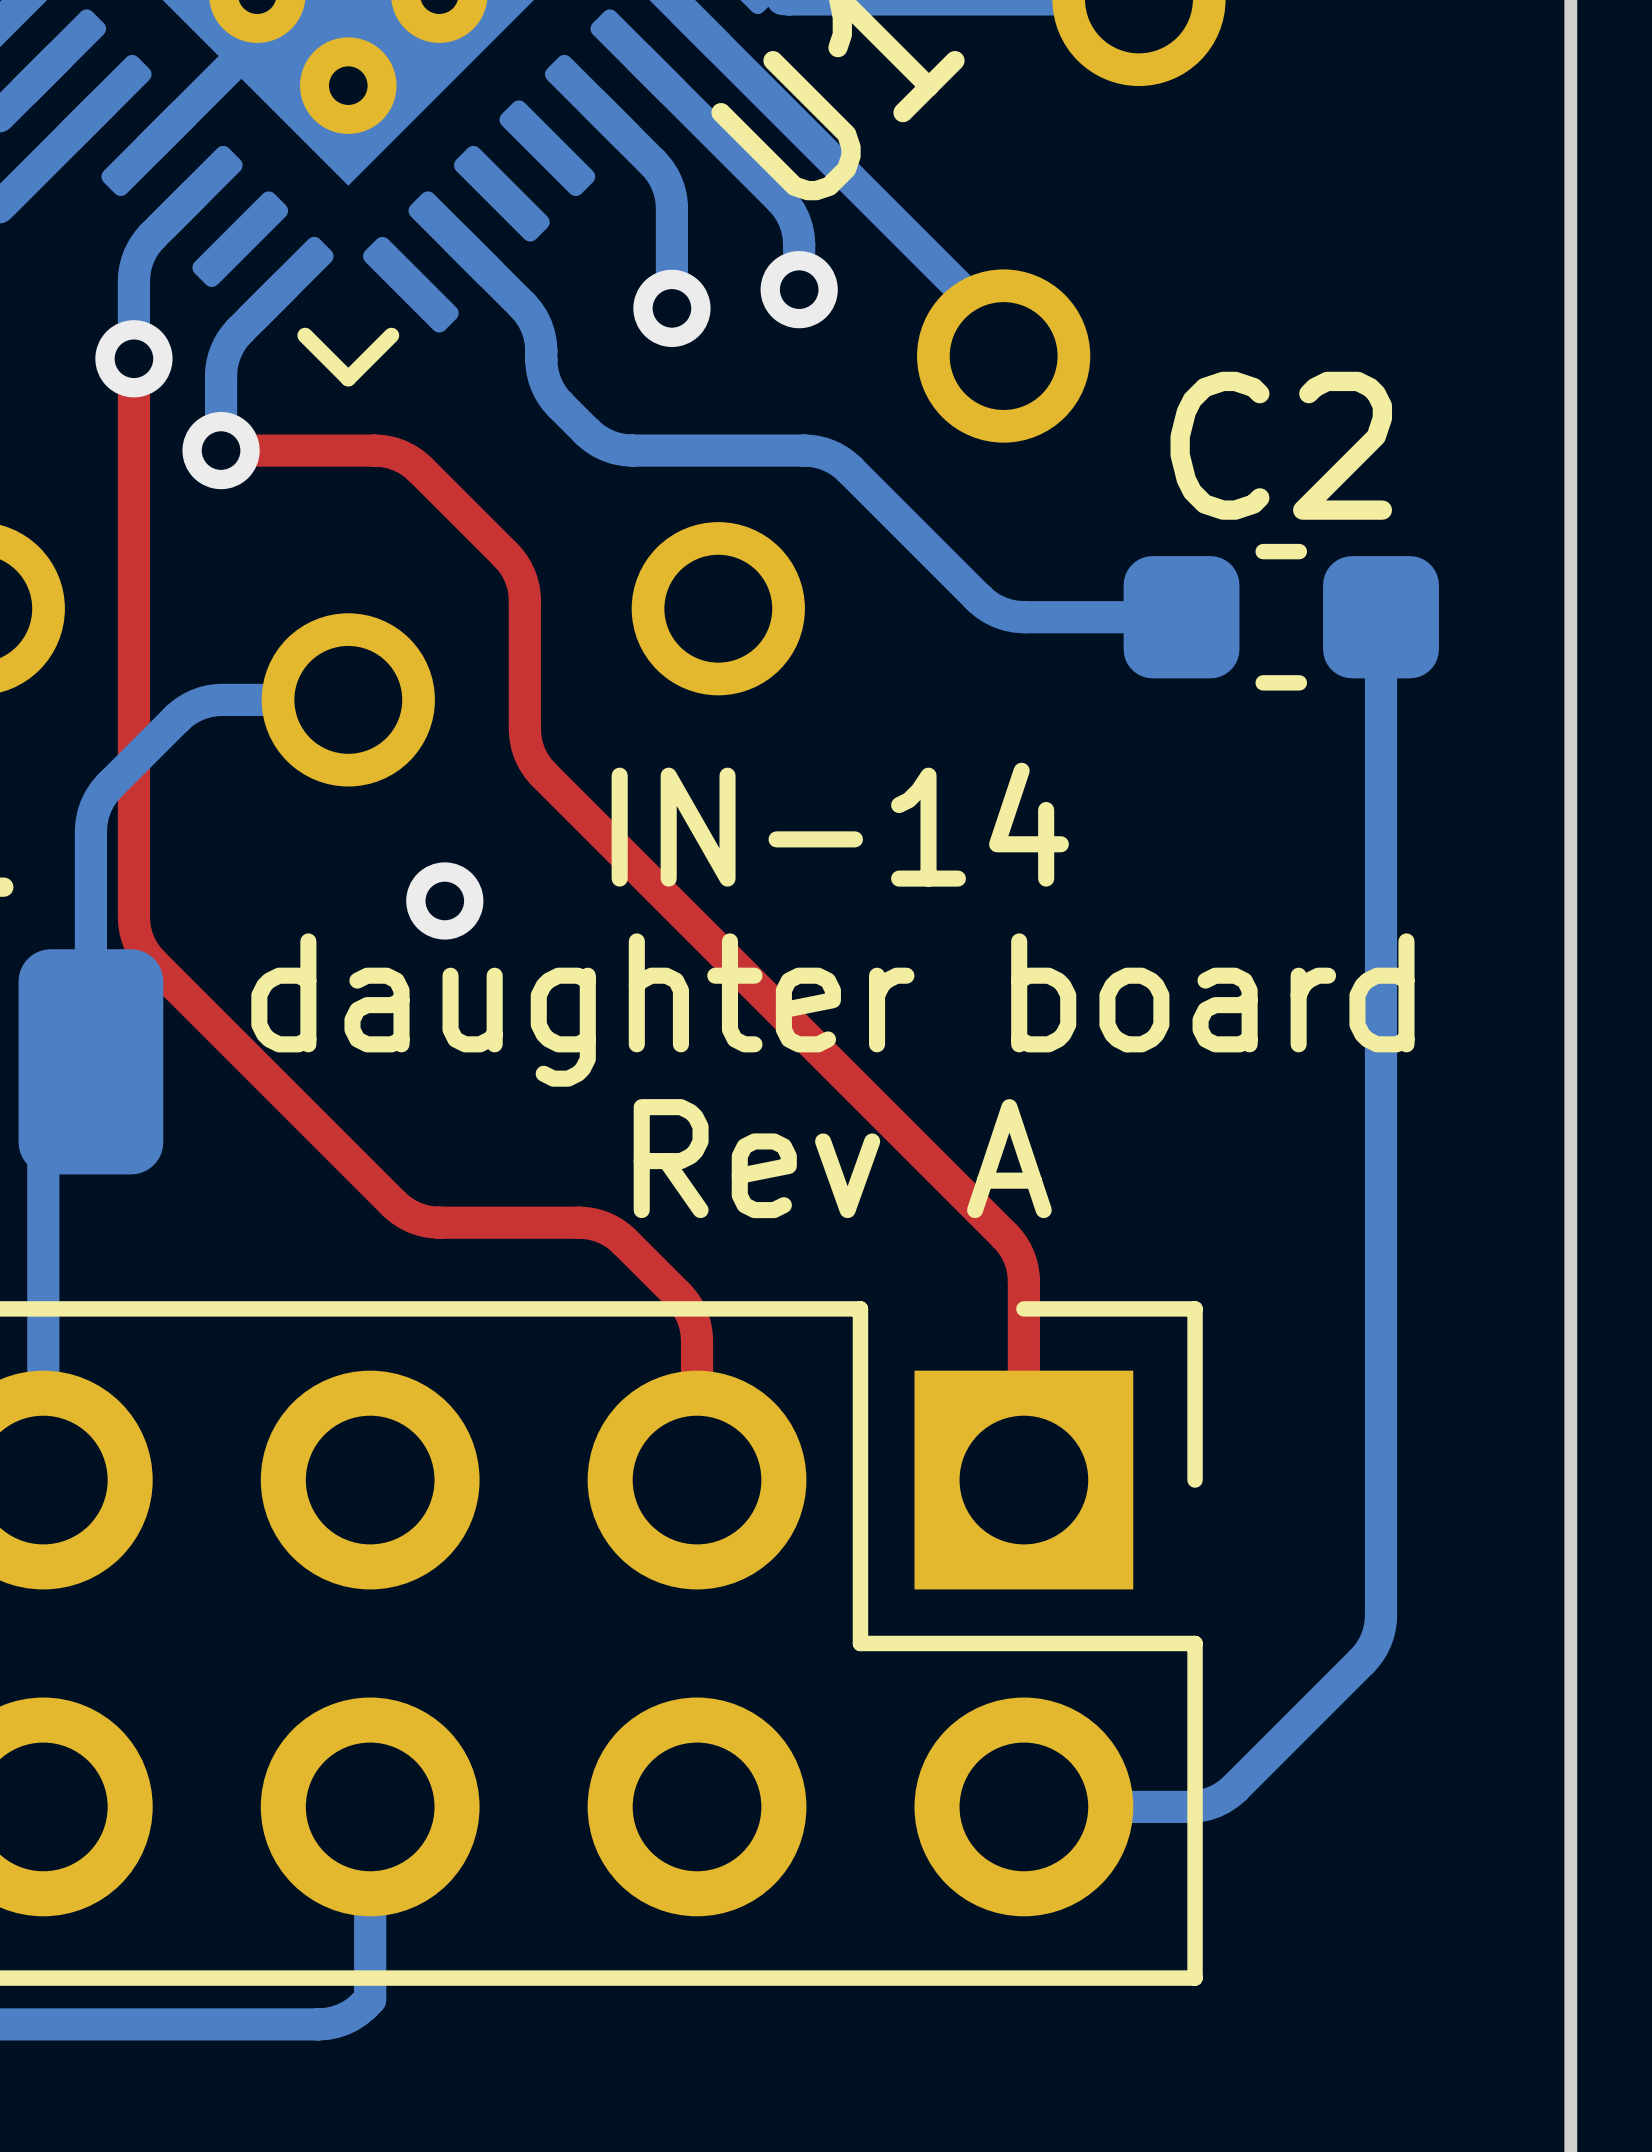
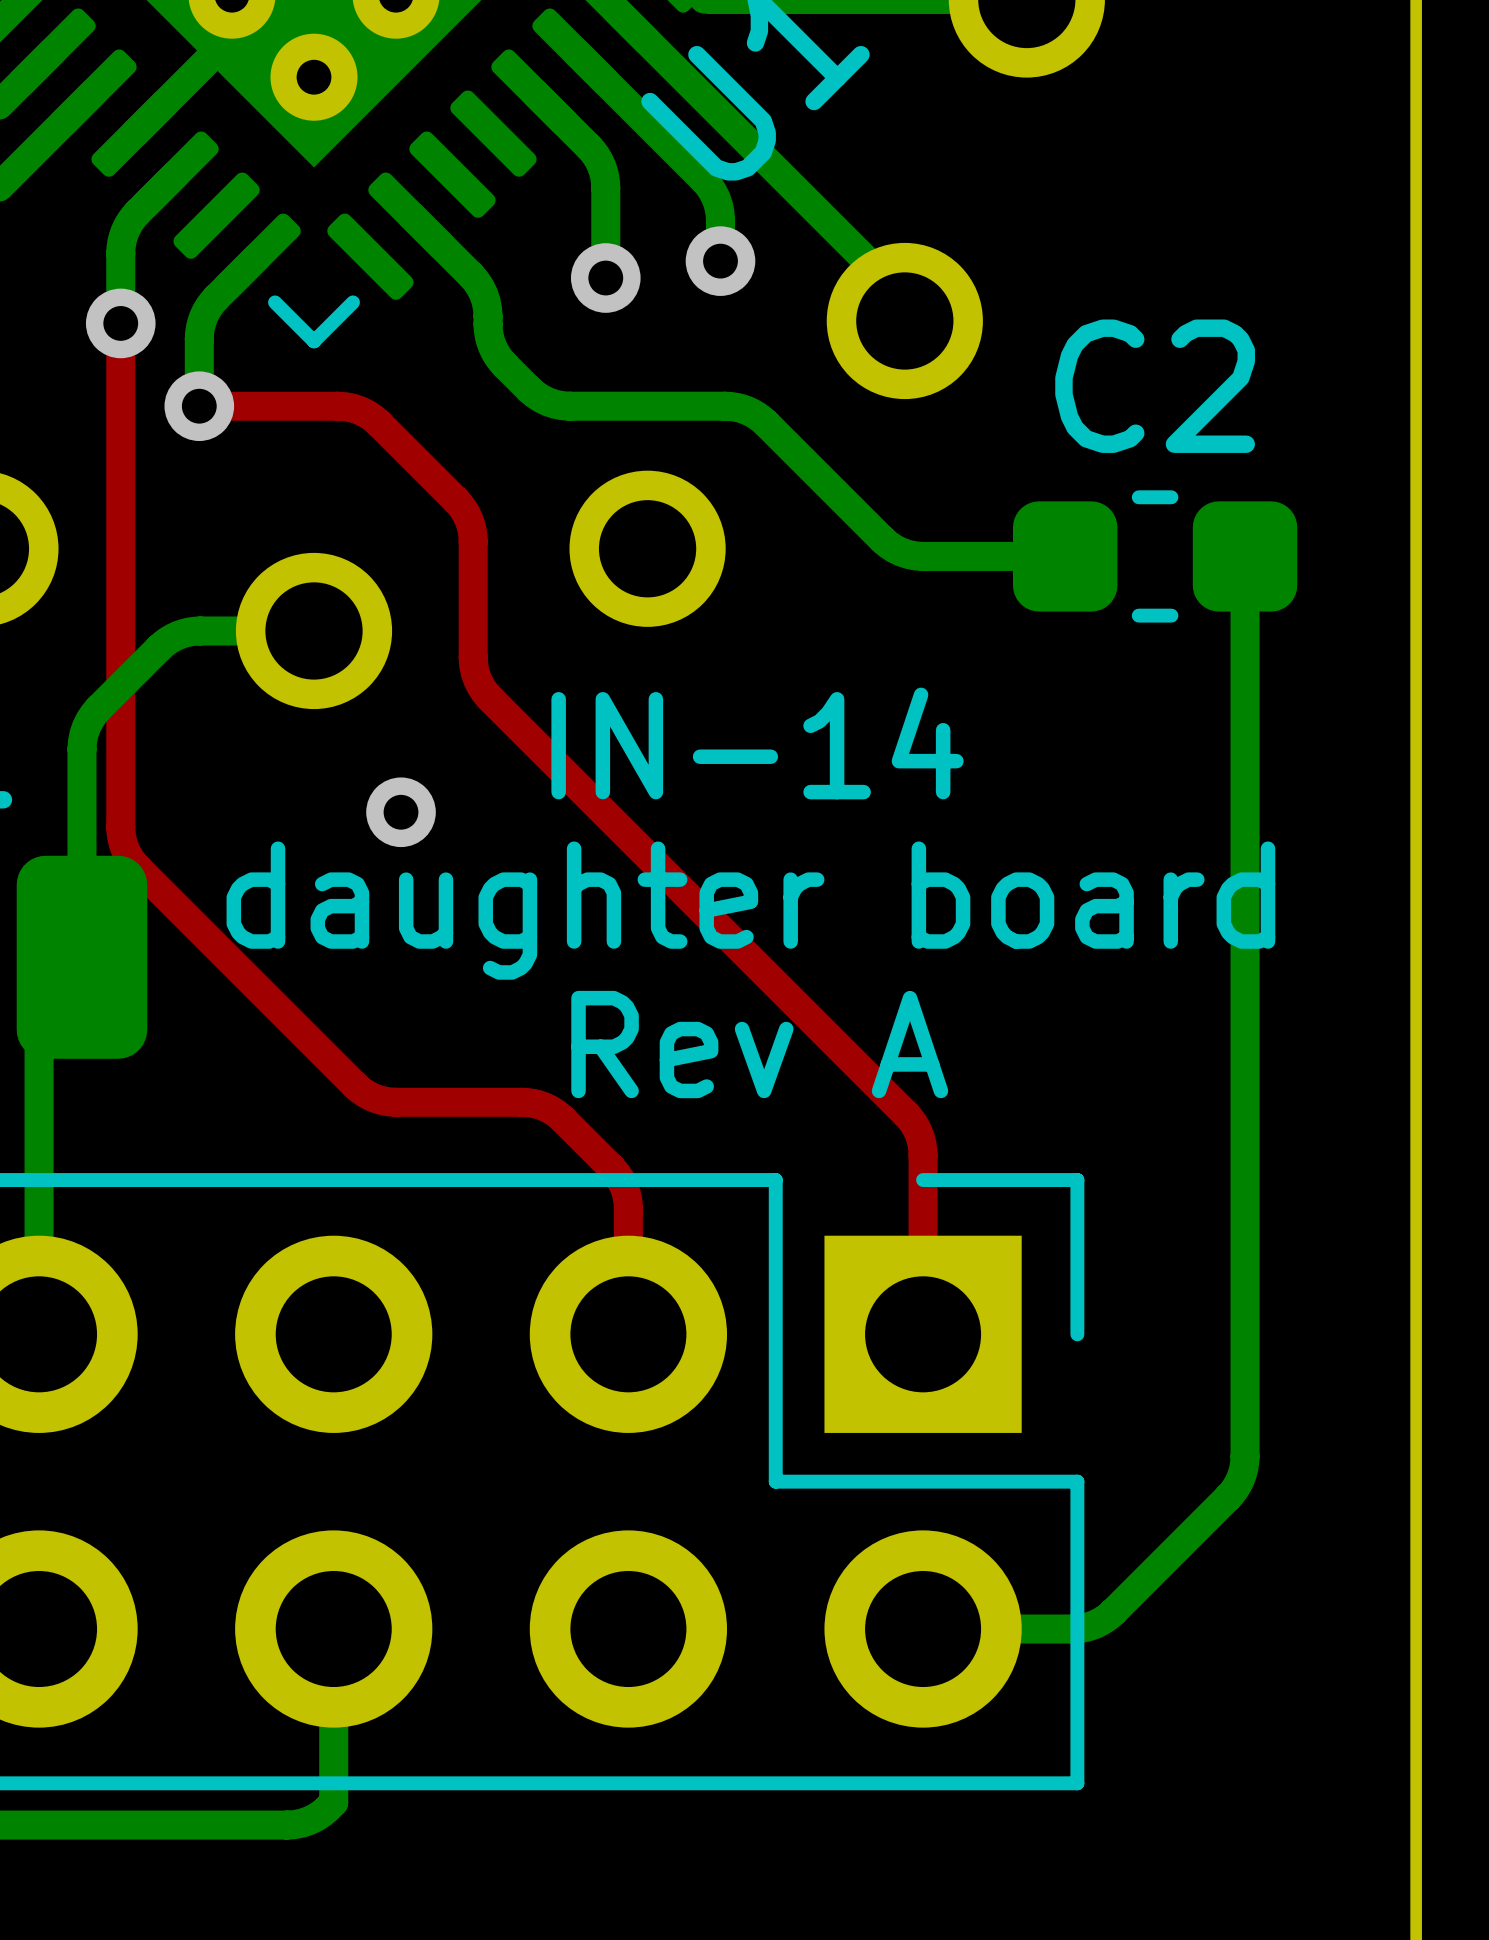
C2 name position: C2 (1281, 445) -> C2 (1155, 386)

